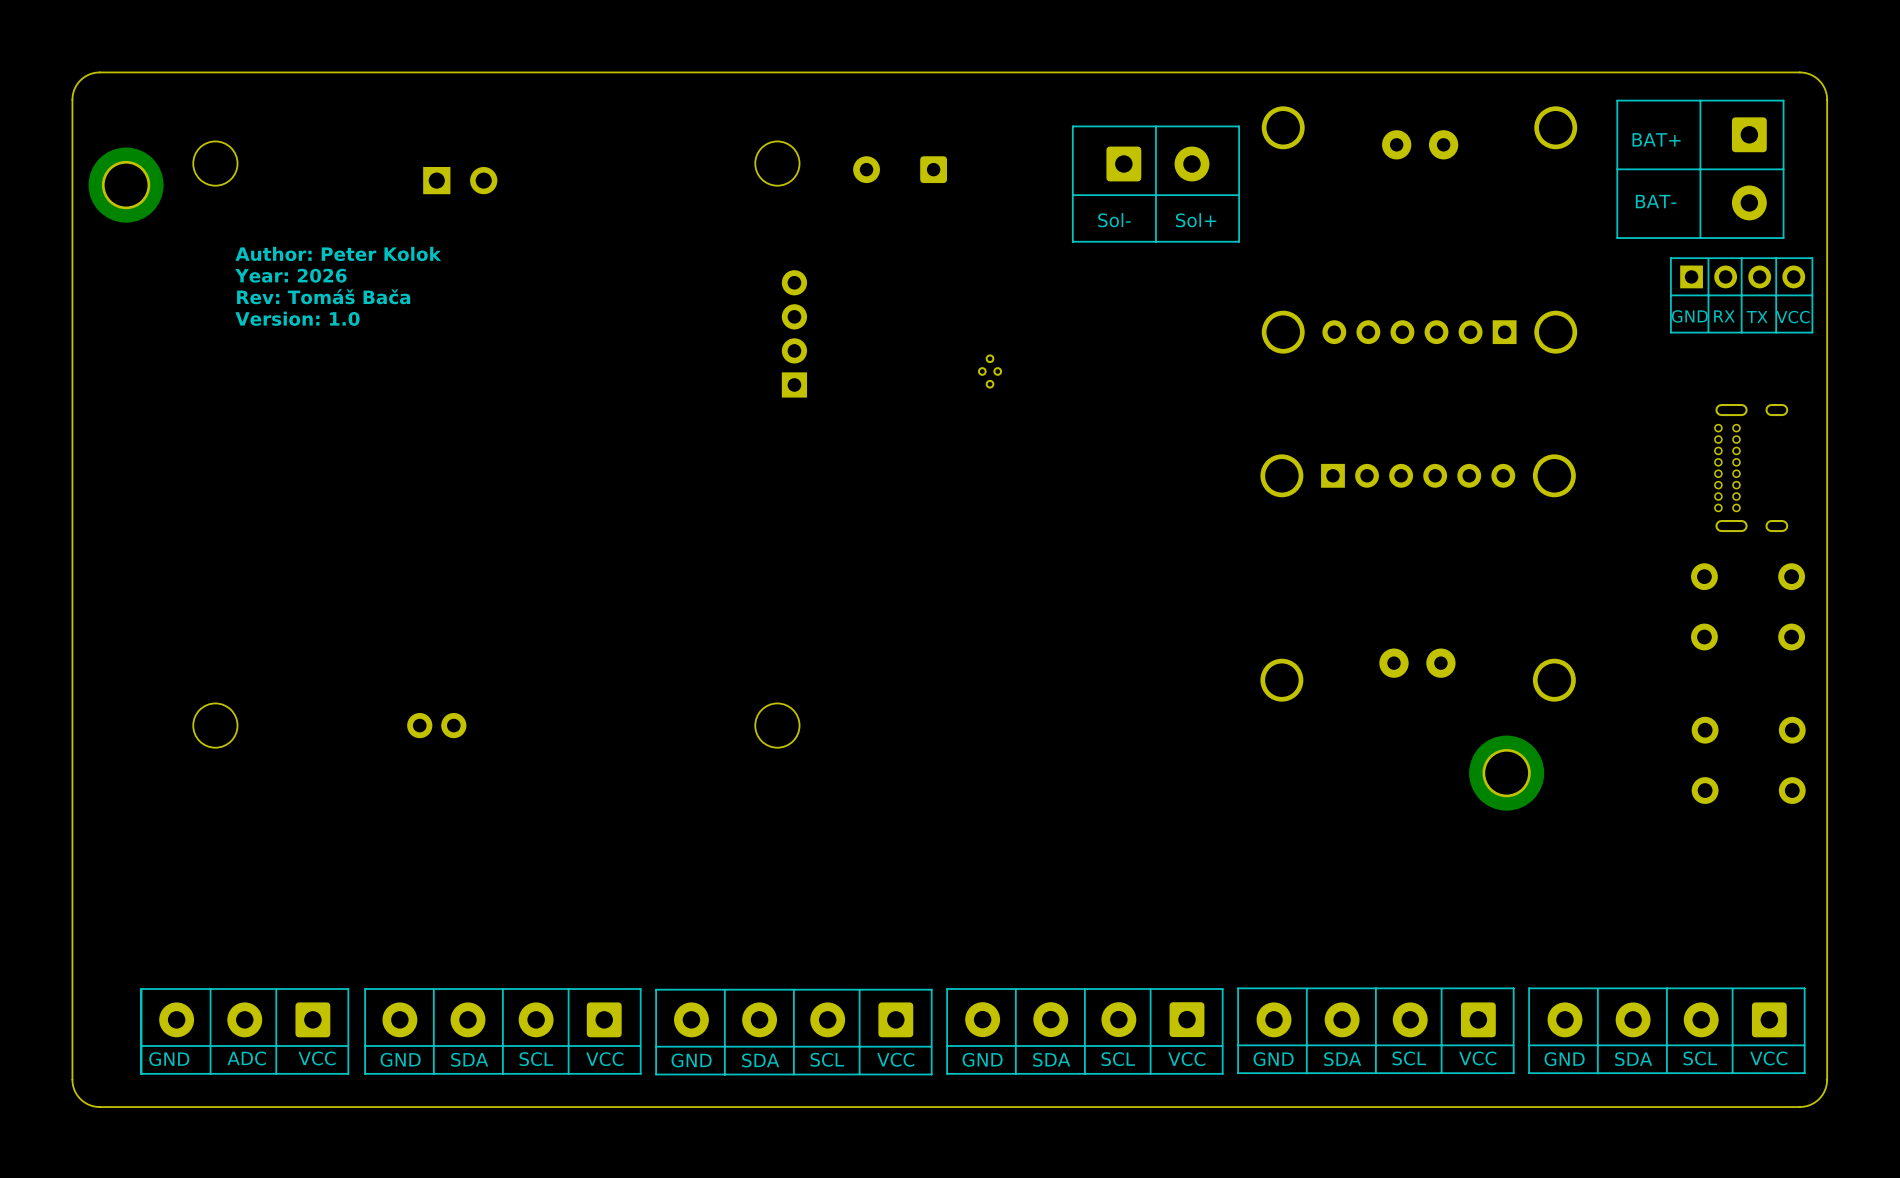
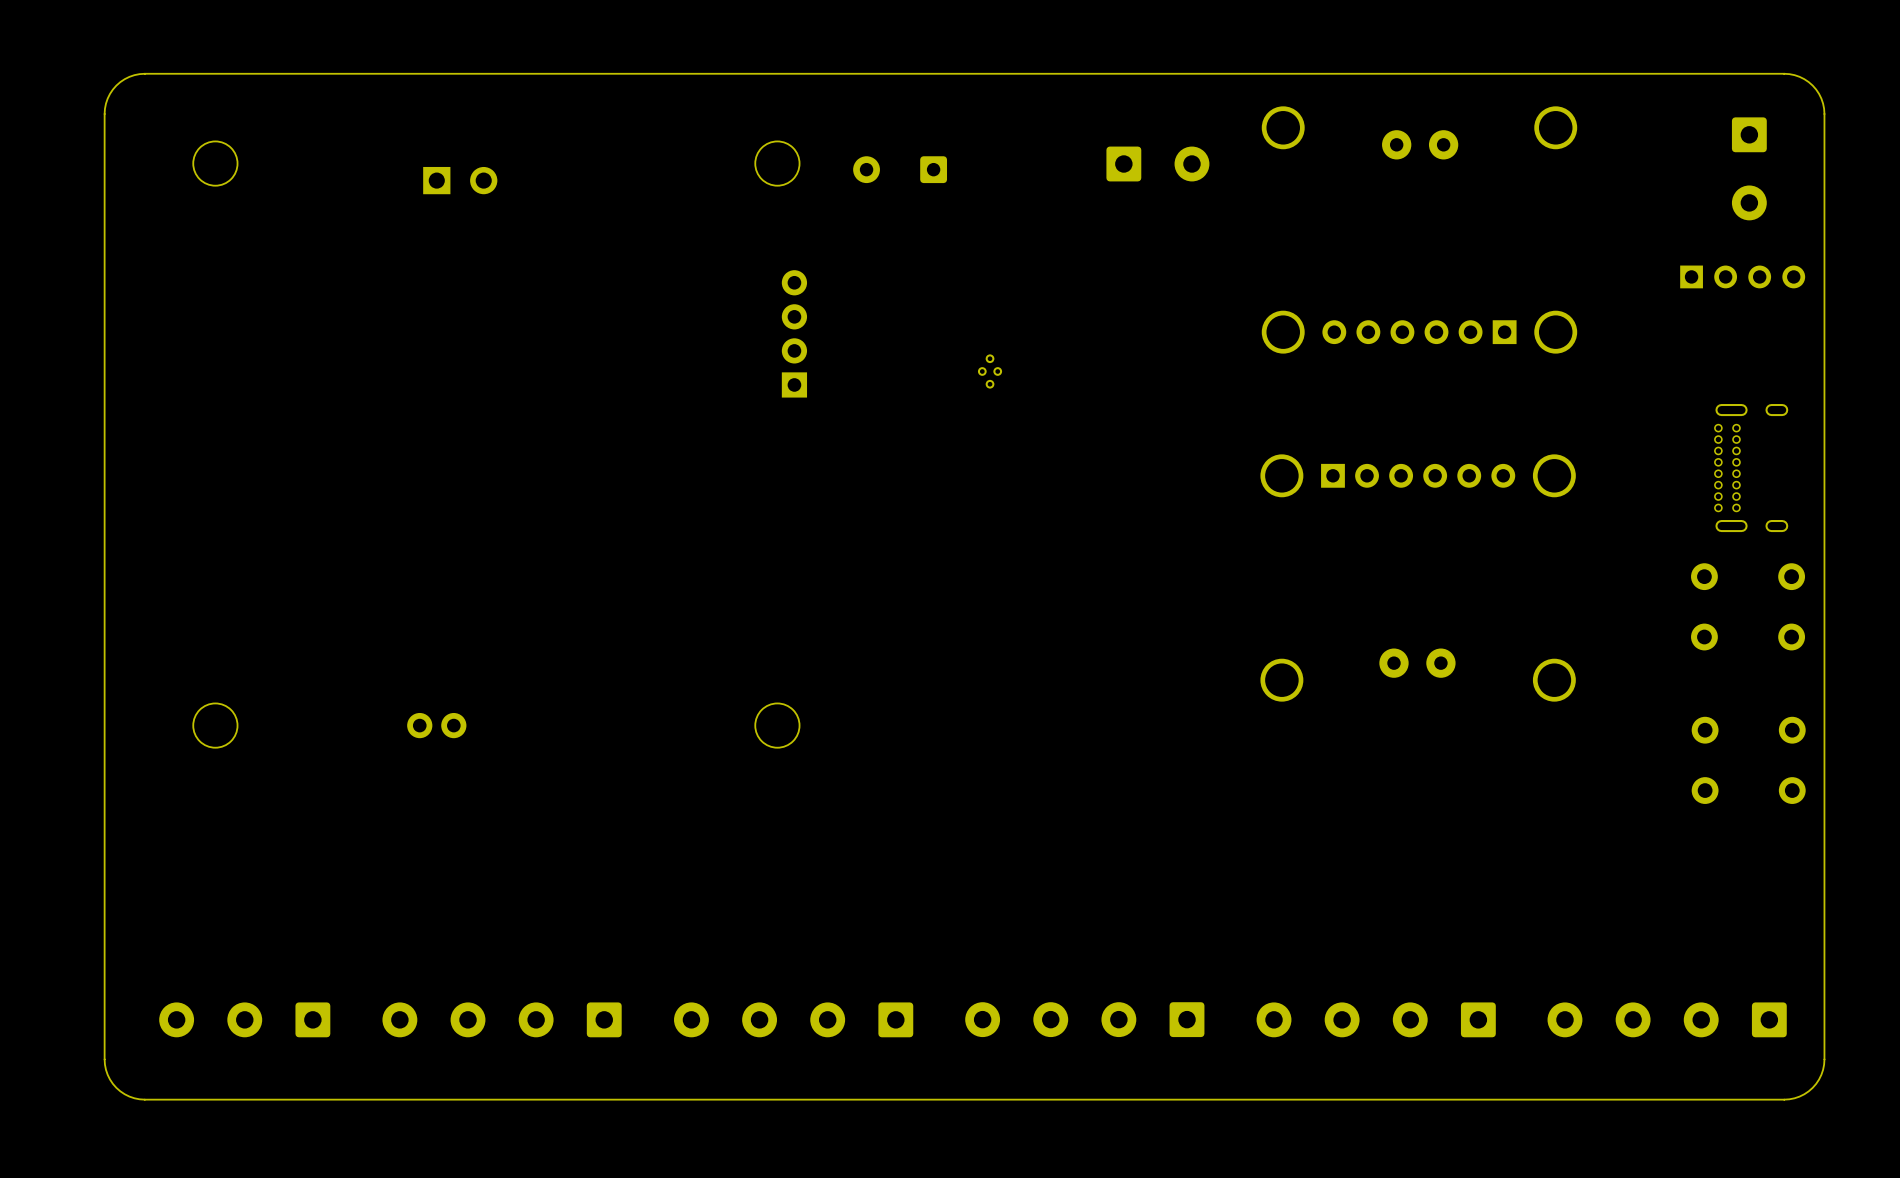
board edge: (1799, 72) (99, 72) (85, 76) (75, 87) (72, 99) (72, 1079) (76, 1094) (85, 1102) (99, 1107) (1799, 1107) (1814, 1102) (1822, 1094) (1827, 1079) (1827, 99) (1824, 87) (1819, 80) (1811, 75) (1799, 72) -> (1784, 73) (1799, 76) (1812, 85) (1821, 98) (1824, 114) (1824, 1059) (1819, 1079) (1804, 1094) (1784, 1099) (144, 1099) (124, 1094) (110, 1079) (104, 1059) (104, 114) (110, 93) (124, 79) (144, 73) (1784, 73)
line: (1700, 100) (1700, 238) -> none
line: (1783, 100) (1617, 100) (1617, 238) (1783, 238) (1783, 100) -> none
line: (1155, 126) (1155, 241) -> none
line: (1239, 126) (1072, 126) (1072, 241) (1239, 241) (1239, 126) -> none
text: BAT+ (1656, 139) -> none
line: (1783, 169) (1617, 169) -> none
part: (126, 185) -> none
line: (1239, 195) (1072, 195) -> none
text: BAT- (1656, 201) -> none
text: Sol- (1114, 220) -> none
text: Sol+ (1196, 220) -> none
text: Author: Peter Kolok (338, 253) -> none
line: (1708, 258) (1708, 331) -> none
line: (1741, 258) (1741, 332) -> none
line: (1776, 258) (1776, 332) -> none
line: (1812, 258) (1670, 258) (1670, 332) (1812, 332) (1812, 258) -> none
text: Year: 2026 (290, 275) -> none
line: (1812, 295) (1670, 295) -> none
text: Rev: Tomáš Bača (323, 296) -> none
text: GND (1689, 316) -> none
text: RX (1724, 316) -> none
text: TX (1757, 317) -> none
text: VCC (1792, 317) -> none
text: Version: 1.0 (297, 318) -> none
part: (1506, 773) -> none
line: (1375, 988) (1375, 1073) -> none
line: (1513, 988) (1238, 988) (1238, 1073) (1513, 1073) (1513, 988) -> none
line: (1666, 988) (1666, 1073) -> none
line: (1804, 988) (1529, 988) (1529, 1073) (1804, 1073) (1804, 988) -> none
line: (210, 989) (210, 1073) -> none
line: (276, 989) (276, 1073) -> none
line: (348, 989) (141, 989) (141, 1073) (348, 1073) (348, 989) -> none
line: (433, 989) (433, 1074) -> none
line: (502, 989) (502, 1073) -> none
line: (568, 989) (568, 1073) -> none
line: (640, 989) (365, 989) (365, 1073) (640, 1073) (640, 989) -> none
line: (793, 989) (793, 1074) -> none
line: (931, 989) (656, 989) (656, 1074) (931, 1074) (931, 989) -> none
line: (1015, 989) (1015, 1074) -> none
line: (1084, 989) (1084, 1073) -> none
line: (1150, 989) (1150, 1073) -> none
line: (1222, 989) (947, 989) (947, 1073) (1222, 1073) (1222, 989) -> none
line: (1306, 989) (1306, 1073) -> none
line: (1441, 989) (1441, 1072) -> none
line: (1597, 989) (1597, 1073) -> none
line: (1732, 989) (1732, 1072) -> none
line: (724, 990) (724, 1074) -> none
line: (859, 990) (859, 1074) -> none
line: (1513, 1045) (1238, 1045) -> none
line: (1804, 1045) (1529, 1045) -> none
line: (348, 1046) (141, 1046) -> none
line: (640, 1046) (365, 1046) -> none
line: (931, 1046) (656, 1046) -> none
line: (1222, 1046) (947, 1046) -> none
text: ADC (246, 1058) -> none
text: VCC (317, 1058) -> none
text: SCL (1409, 1058) -> none
text: VCC (1477, 1058) -> none
text: SCL (1700, 1058) -> none
text: VCC (1768, 1058) -> none
text: GND (169, 1059) -> none
text: GND (400, 1059) -> none
text: SDA (469, 1059) -> none
text: SCL (536, 1059) -> none
text: VCC (604, 1059) -> none
text: SCL (827, 1059) -> none
text: VCC (895, 1059) -> none
text: GND (982, 1059) -> none
text: SDA (1051, 1059) -> none
text: SCL (1118, 1059) -> none
text: VCC (1186, 1059) -> none
text: GND (1273, 1059) -> none
text: SDA (1342, 1059) -> none
text: GND (1564, 1059) -> none
text: SDA (1633, 1059) -> none
text: GND (691, 1060) -> none
text: SDA (760, 1060) -> none

